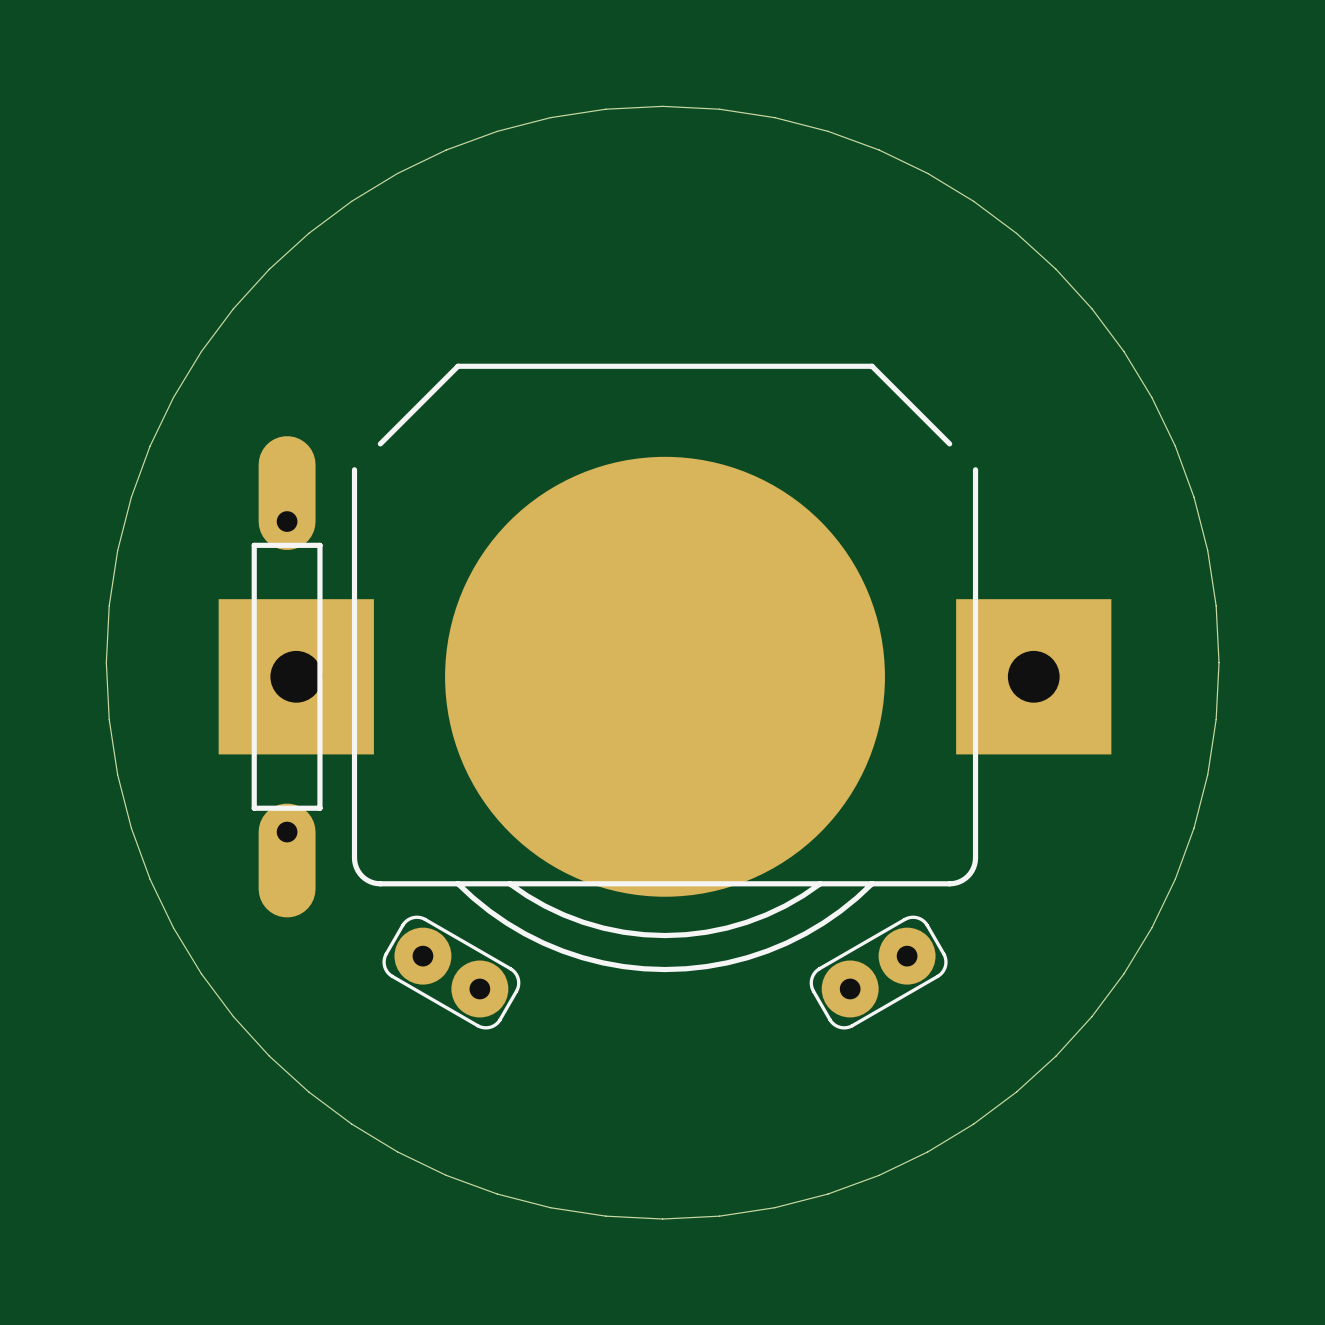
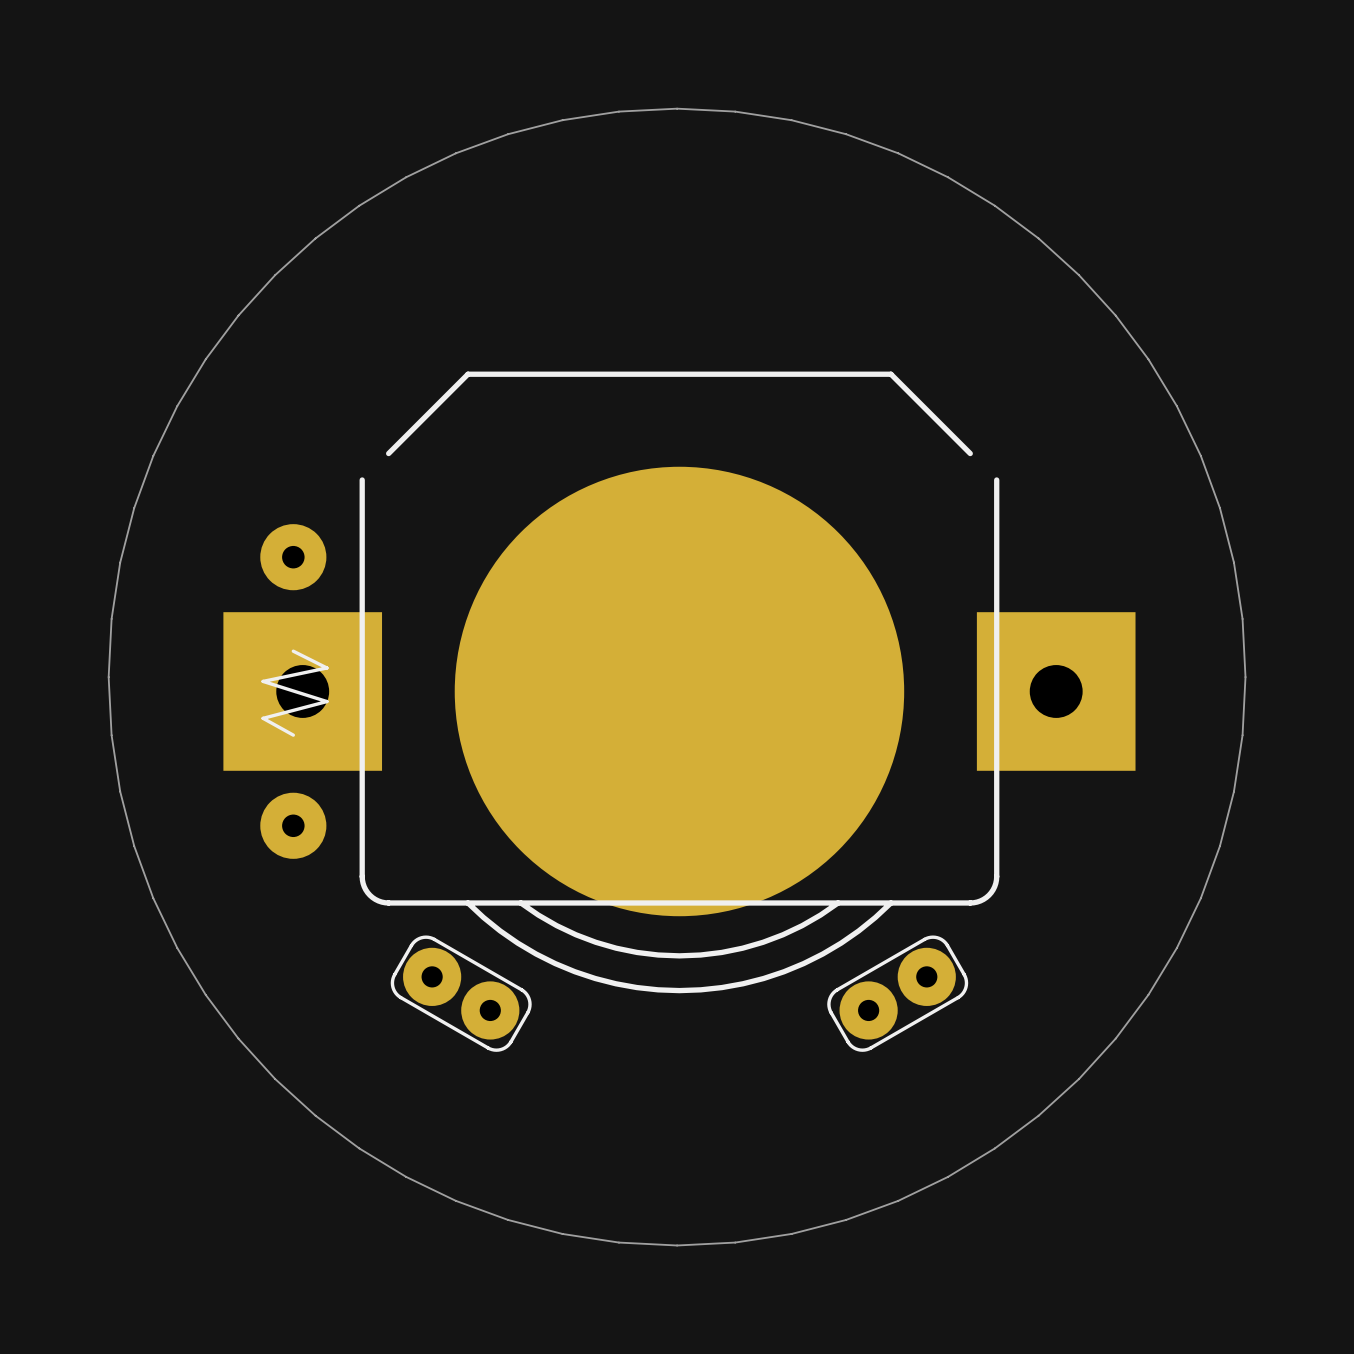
part footprint: [251, 436, 323, 918] -> [260, 524, 329, 859]

